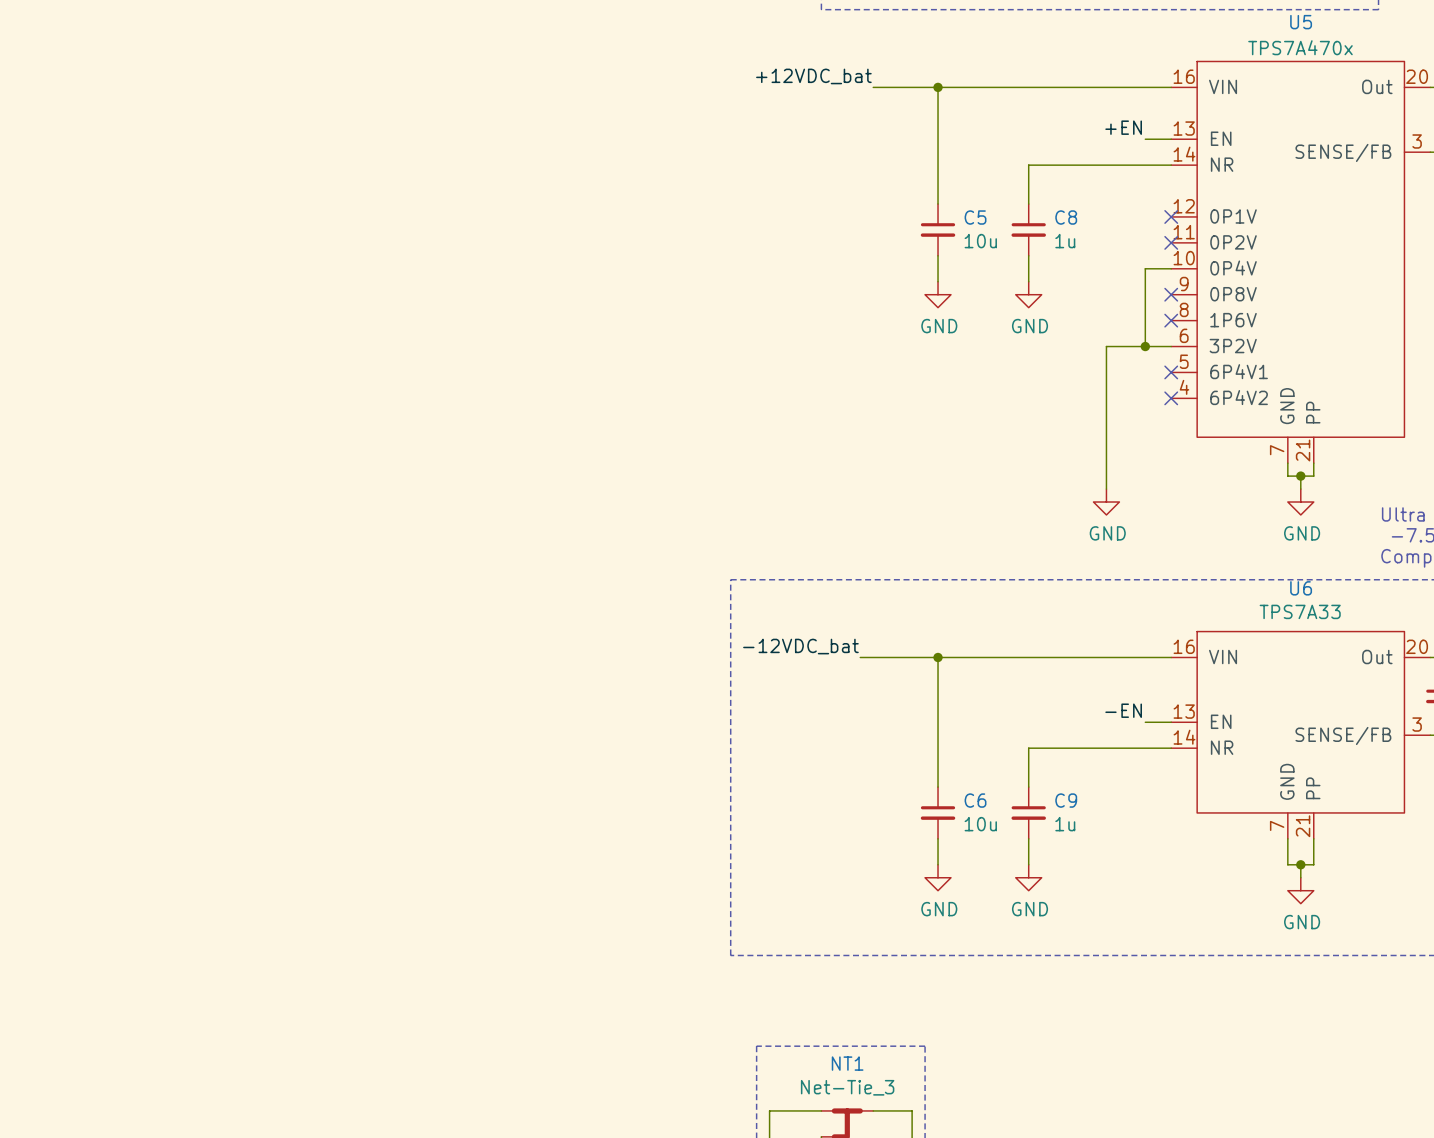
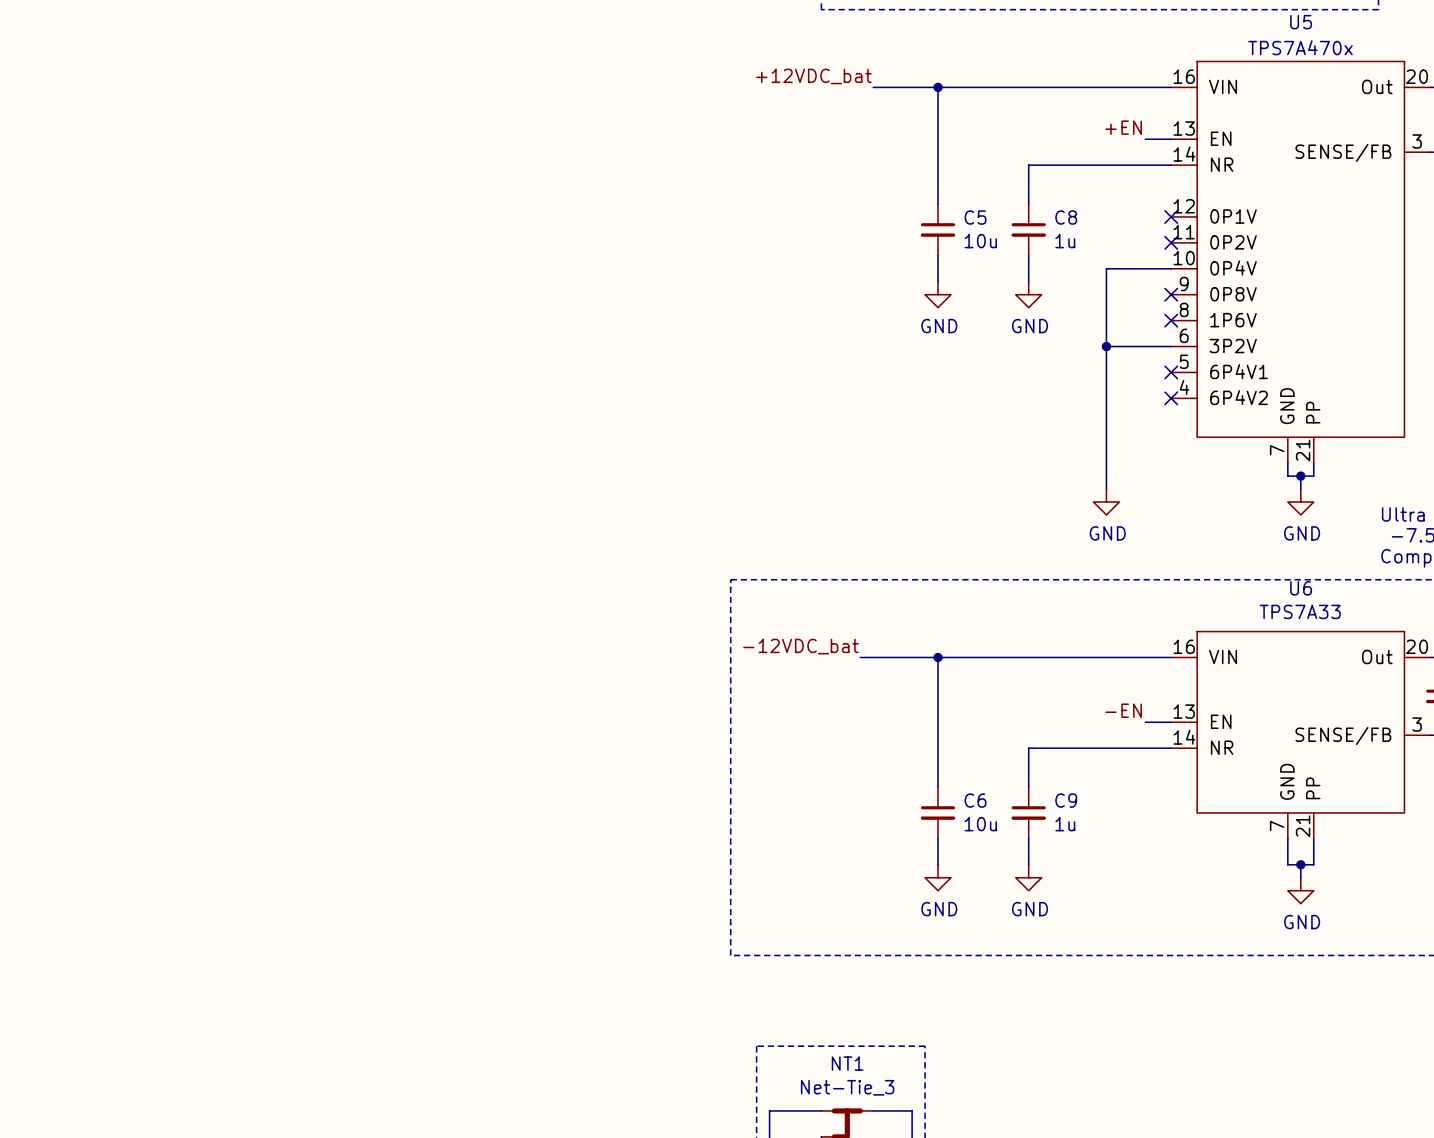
wire: (1145, 268) (1145, 346) -> (1145, 268) (1106, 268) (1106, 346)
junction position: (1145, 346) -> (1106, 346)

